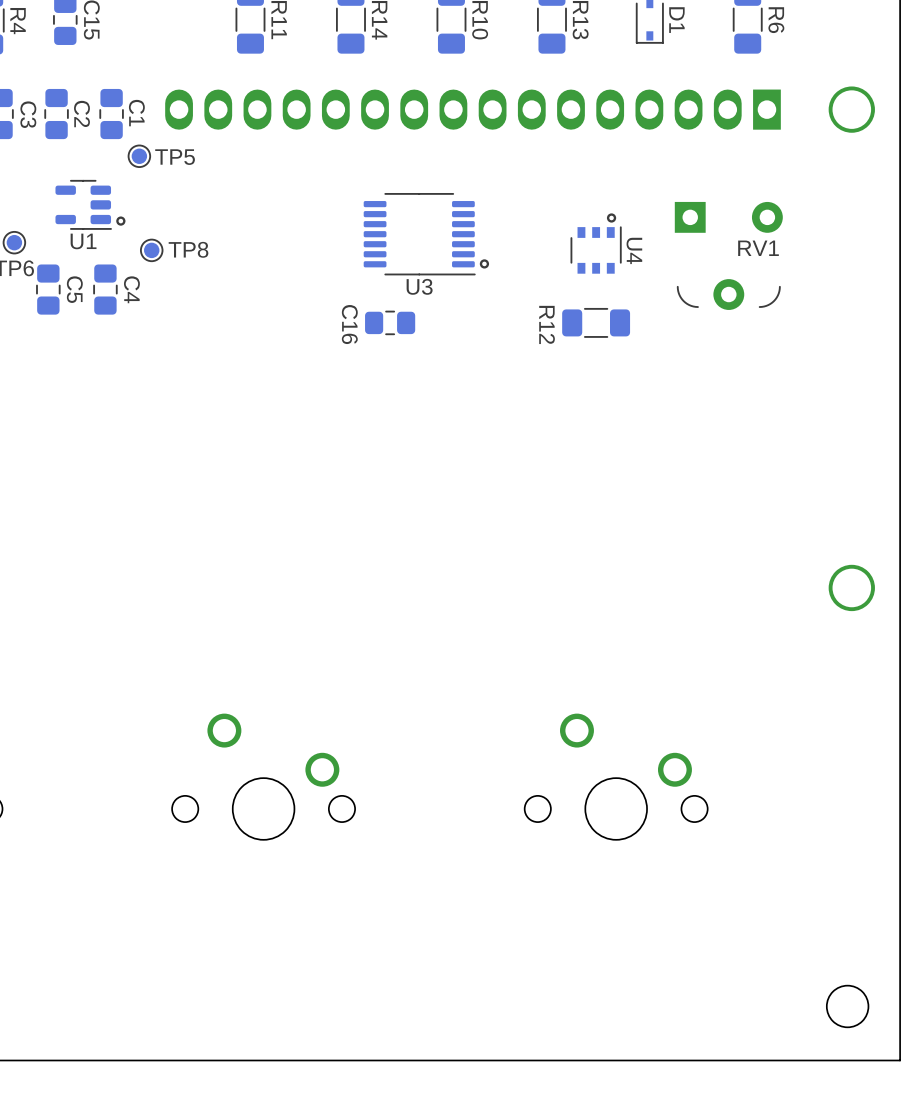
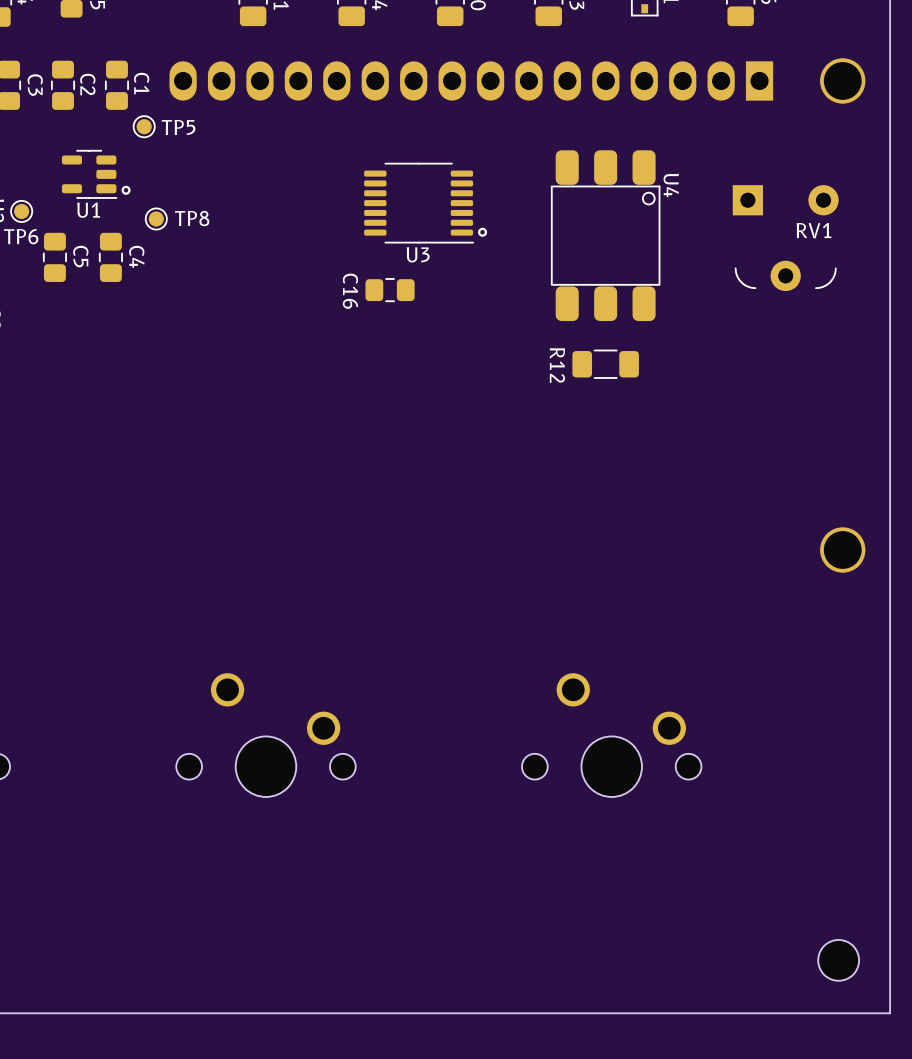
drawing: [606, 213, 617, 223] -> none
U4 footprint: [570, 226, 622, 274] -> [550, 150, 661, 322]
U4 name position: U4 (634, 250) -> U4 (671, 185)
RV1 position: (728, 255) -> (785, 238)
R12 position: (596, 322) -> (605, 364)

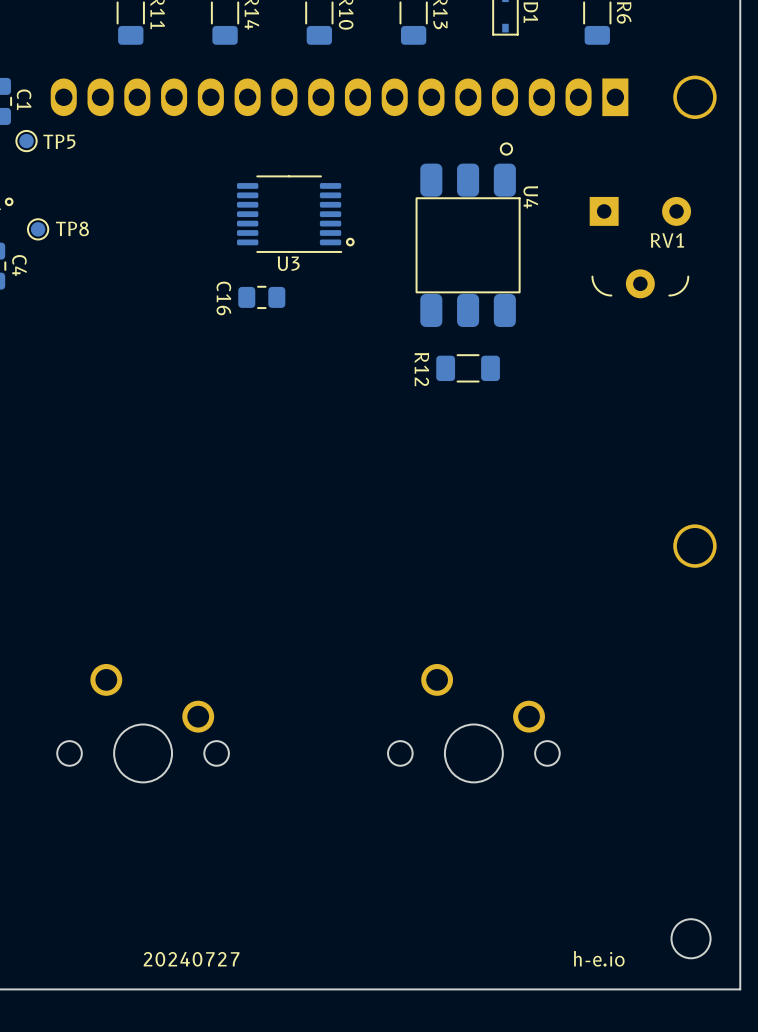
U4 footprint: [550, 150, 661, 322] -> [415, 142, 521, 327]
text: none -> 20240727 (191, 959)
text: none -> h-e.io (599, 958)

